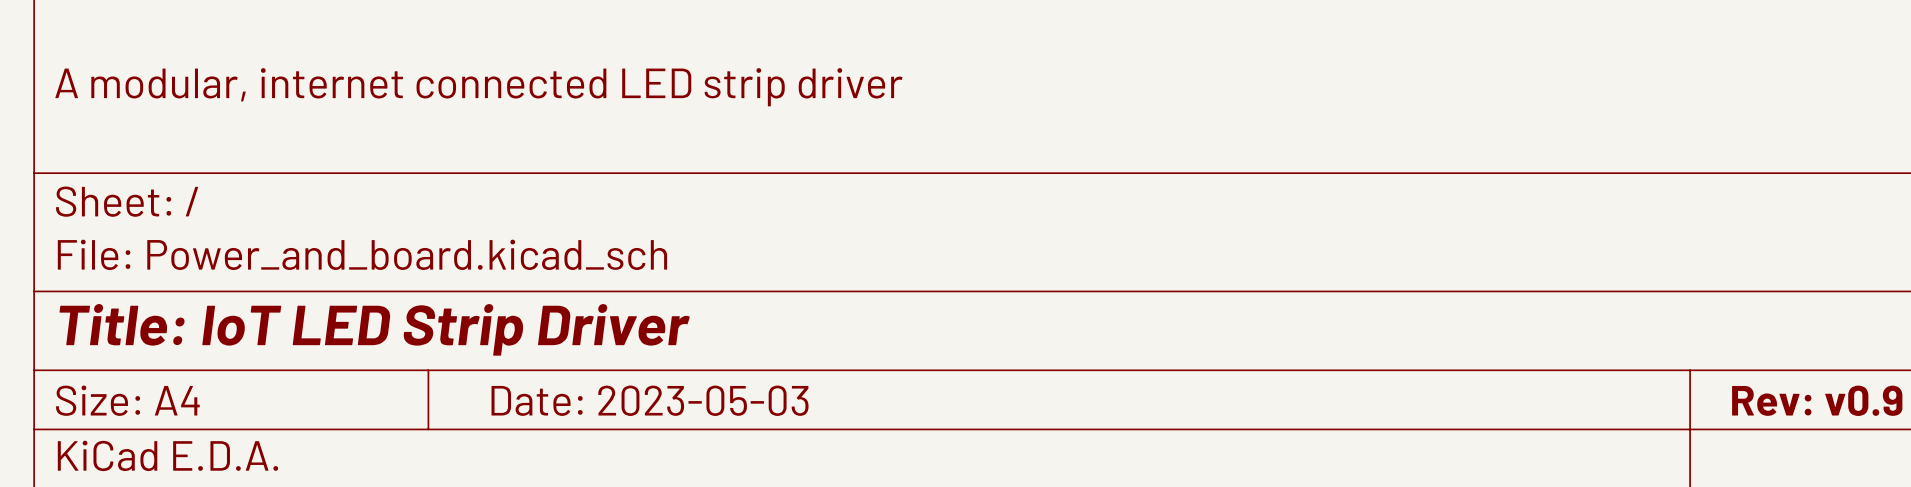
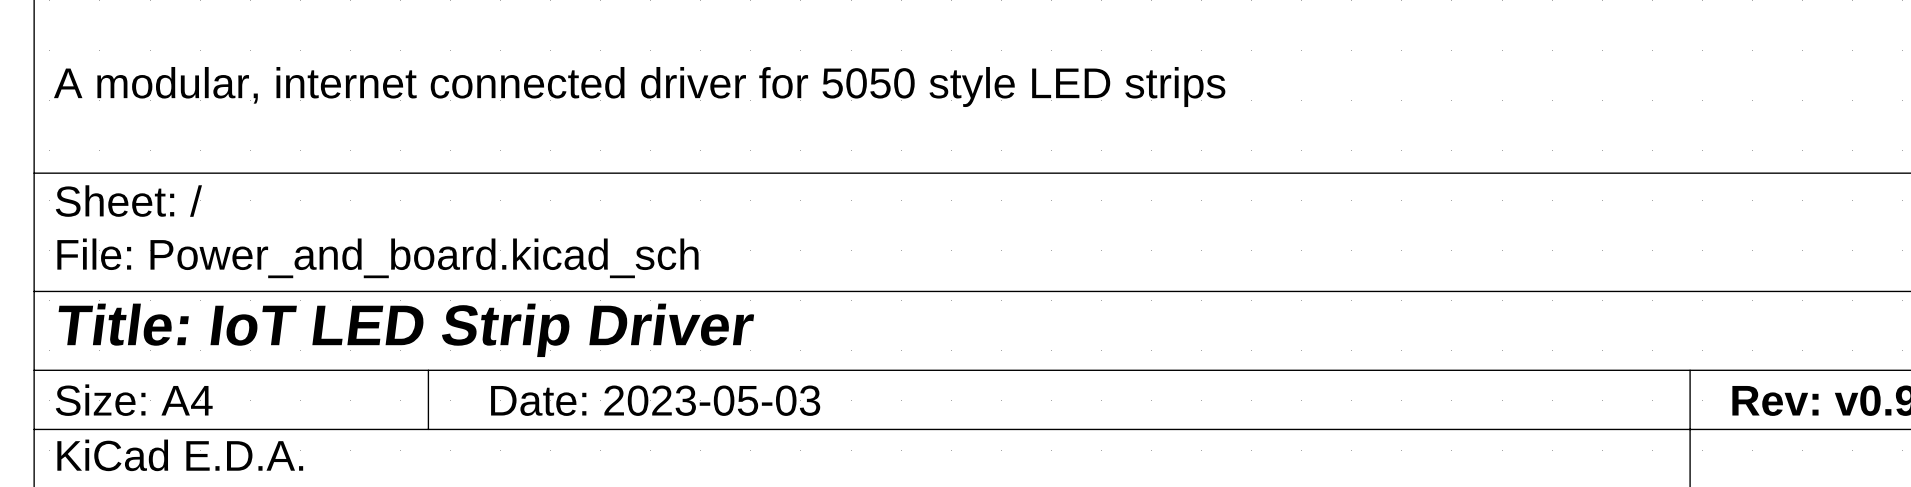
title block: A modular, internet connected LED strip driver (478, 87) -> A modular, internet connected driver for 5050 style LED strips (639, 87)

